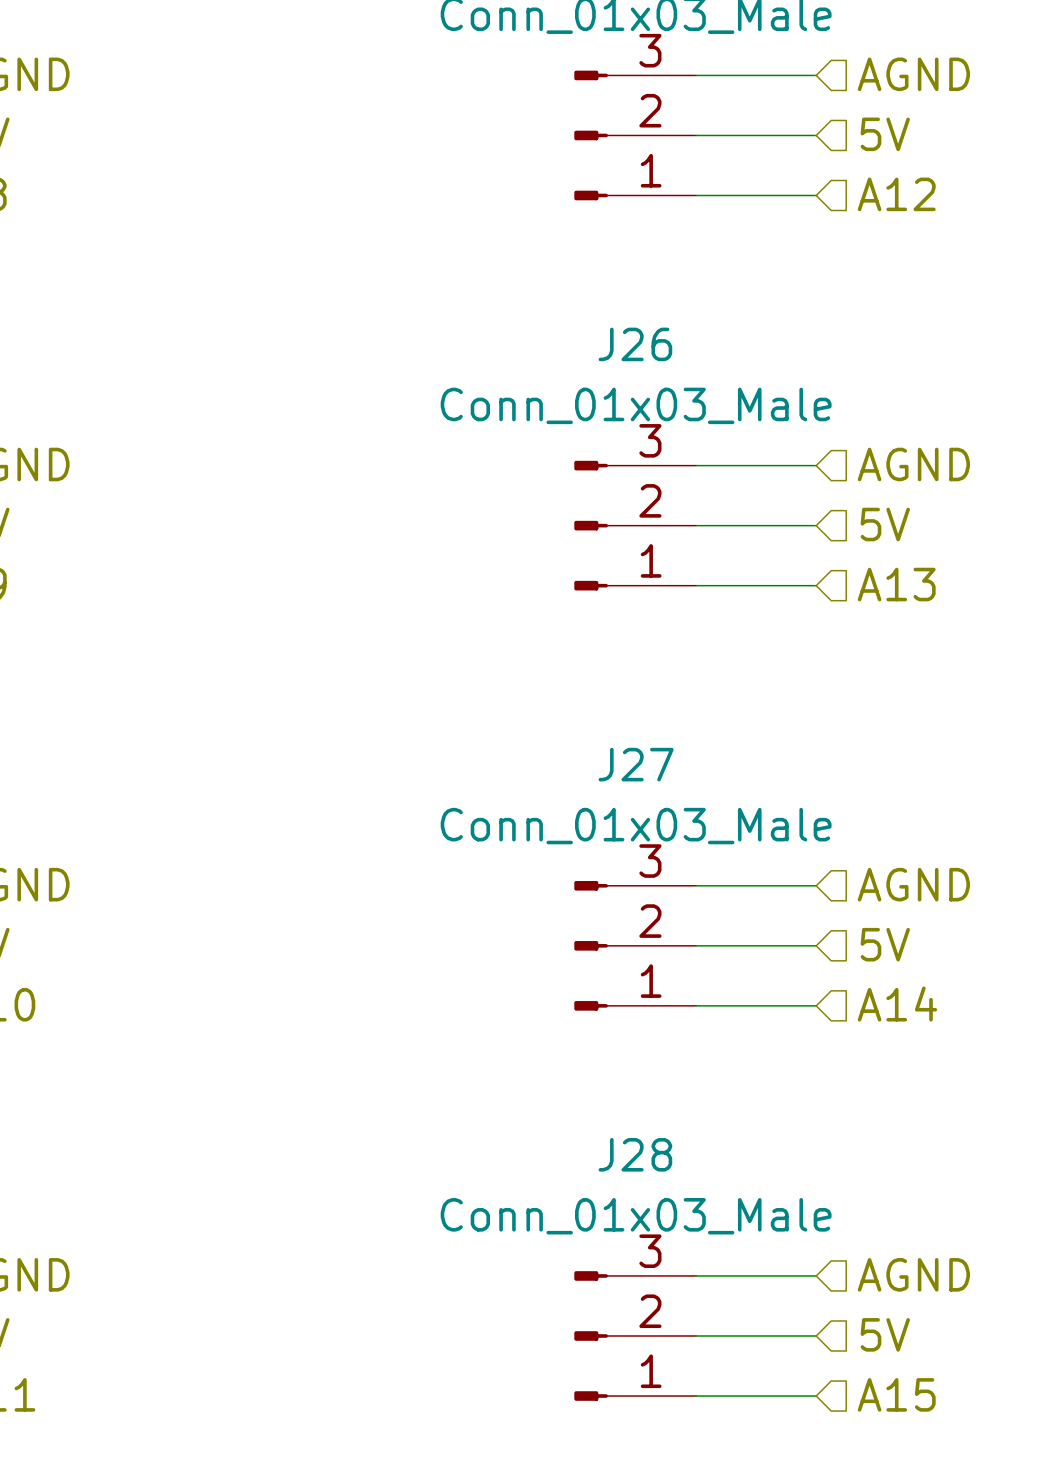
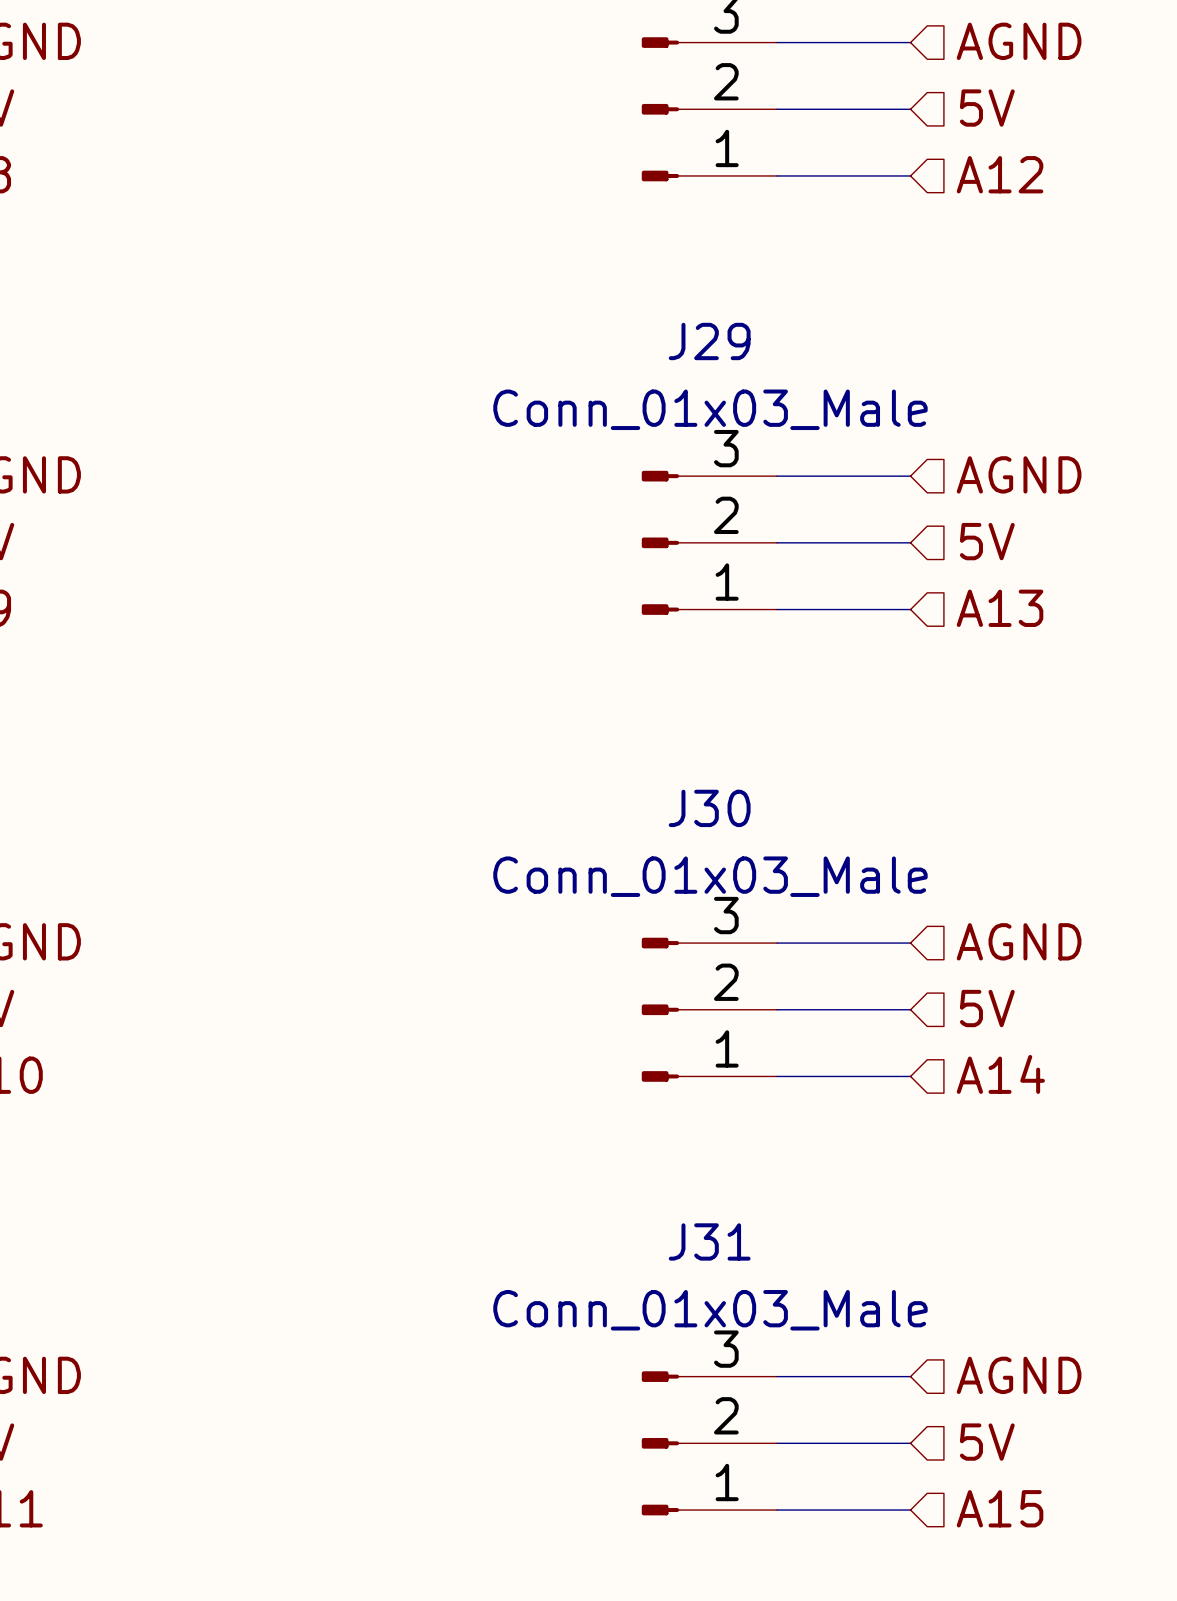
J26 name: J26 (635, 344) -> J29 (709, 341)
J27 name: J27 (636, 764) -> J30 (709, 808)
J28 name: J28 (635, 1154) -> J31 (709, 1241)

